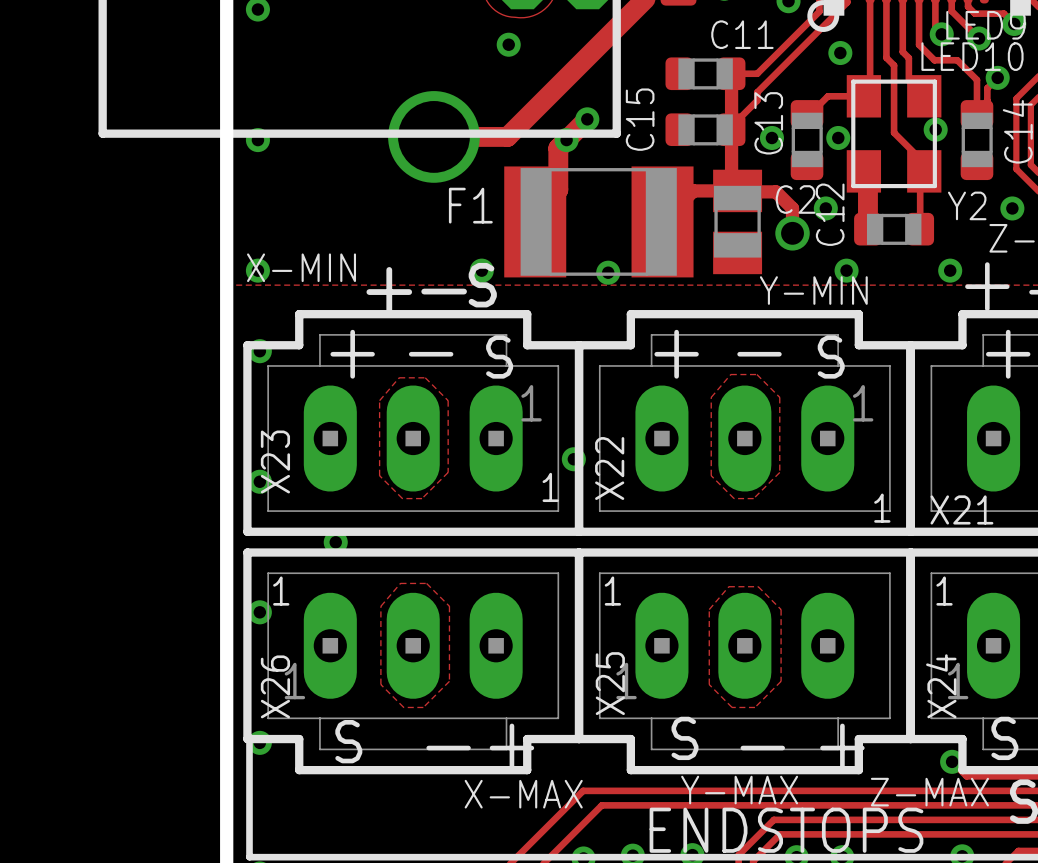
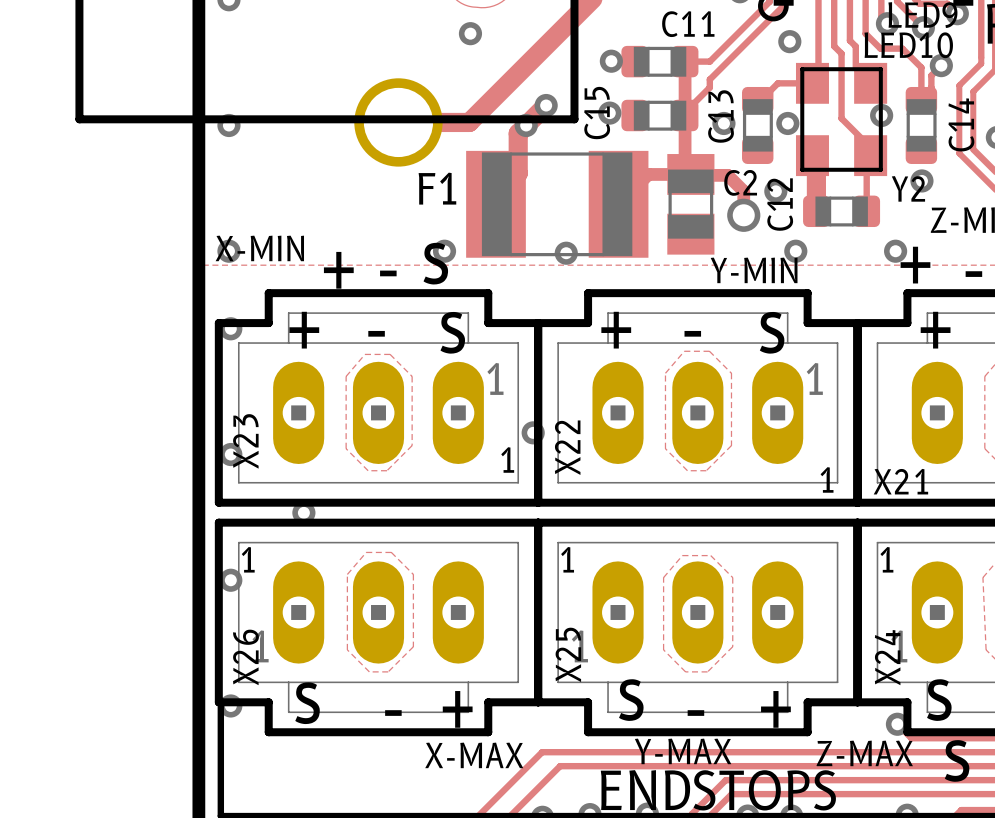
via: none -> (611, 61)
via: none -> (609, 113)
via position: (1012, 208) -> (921, 180)

